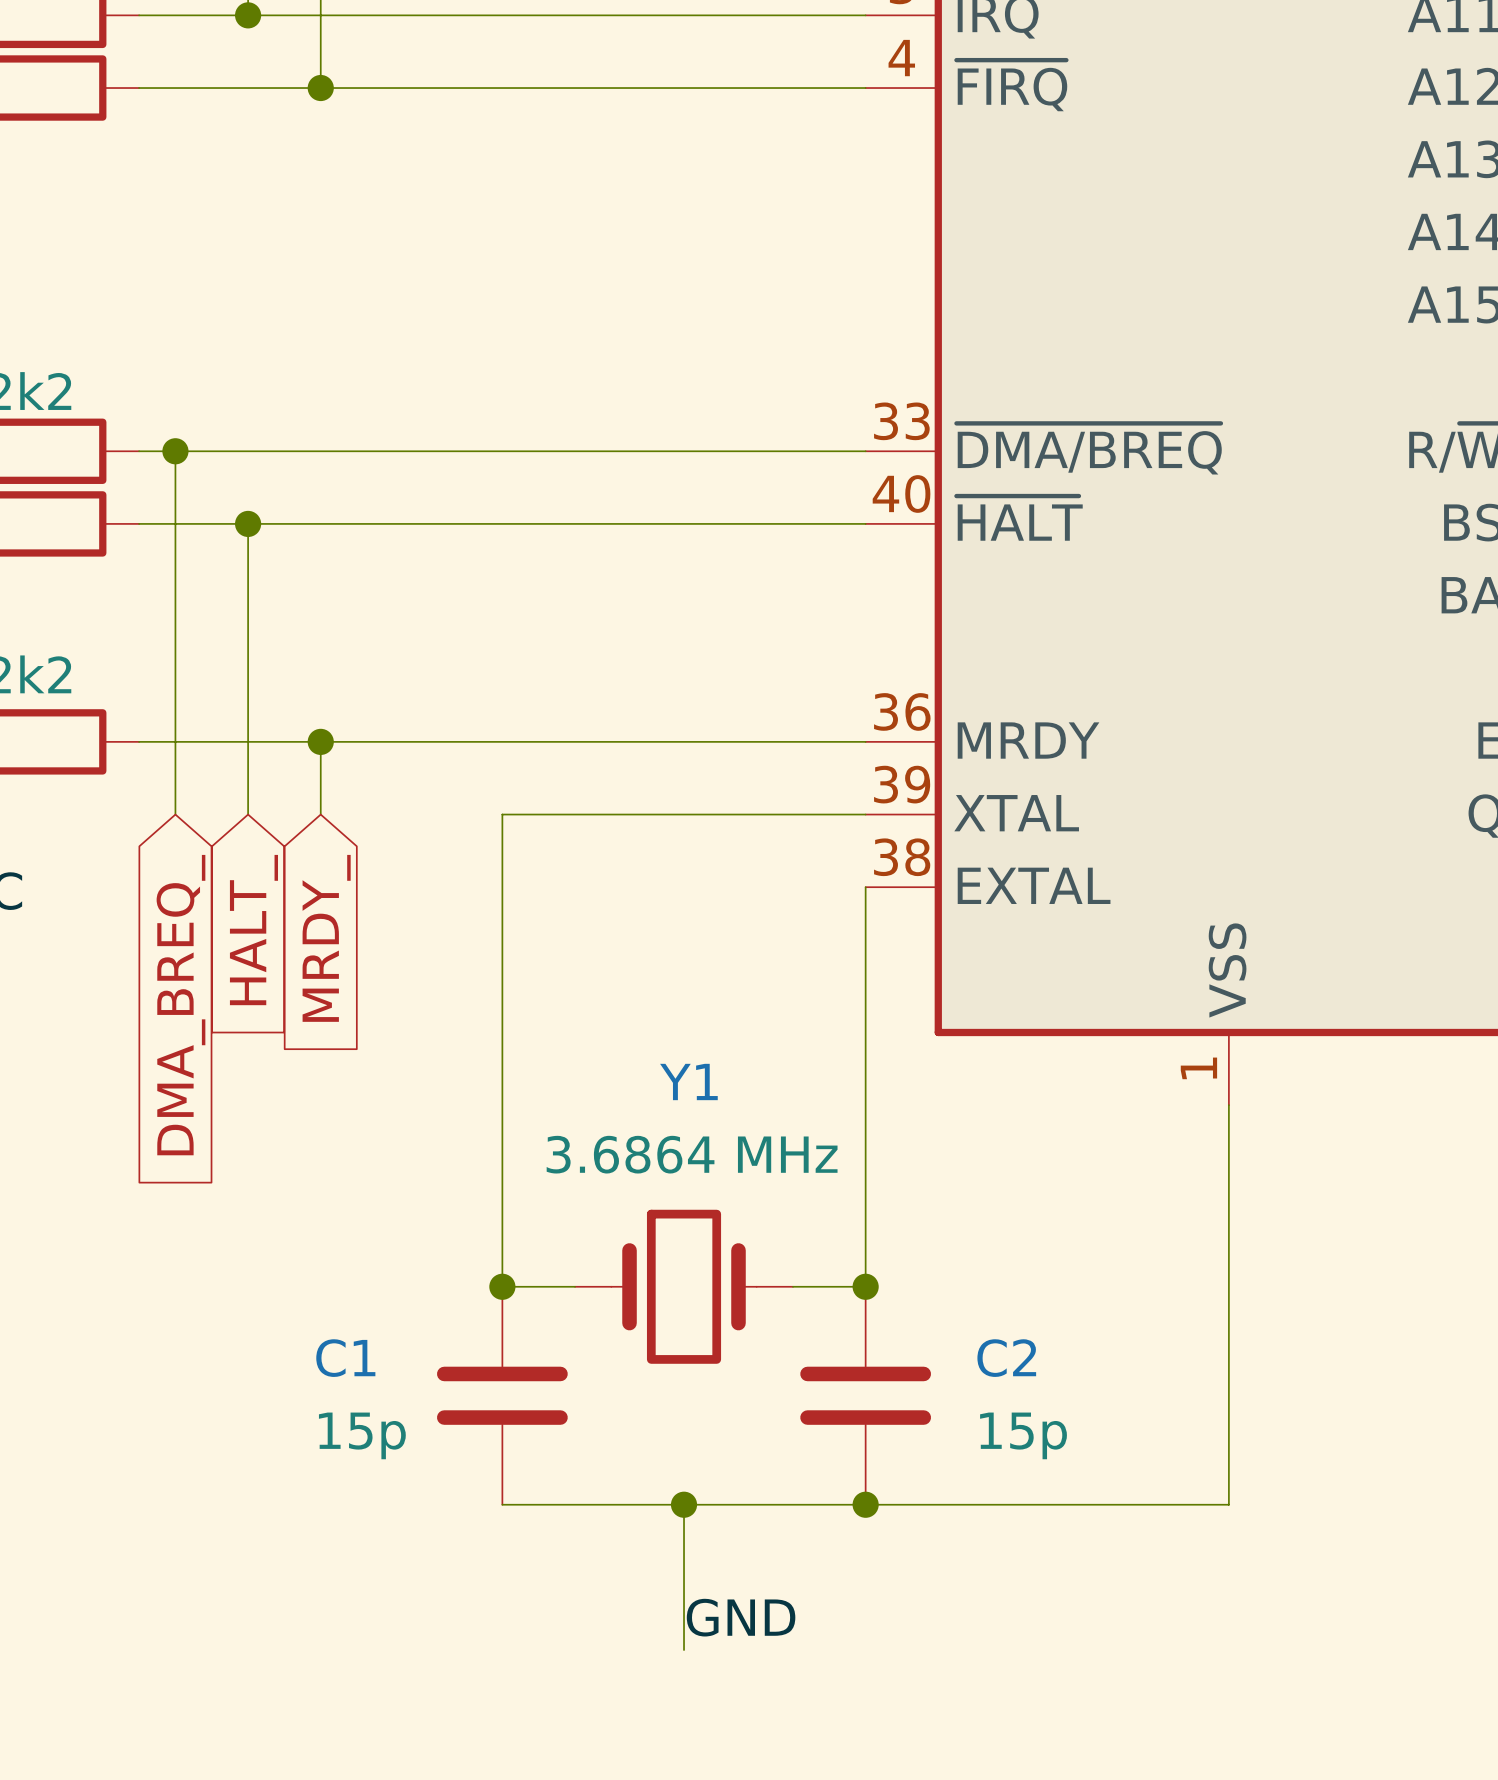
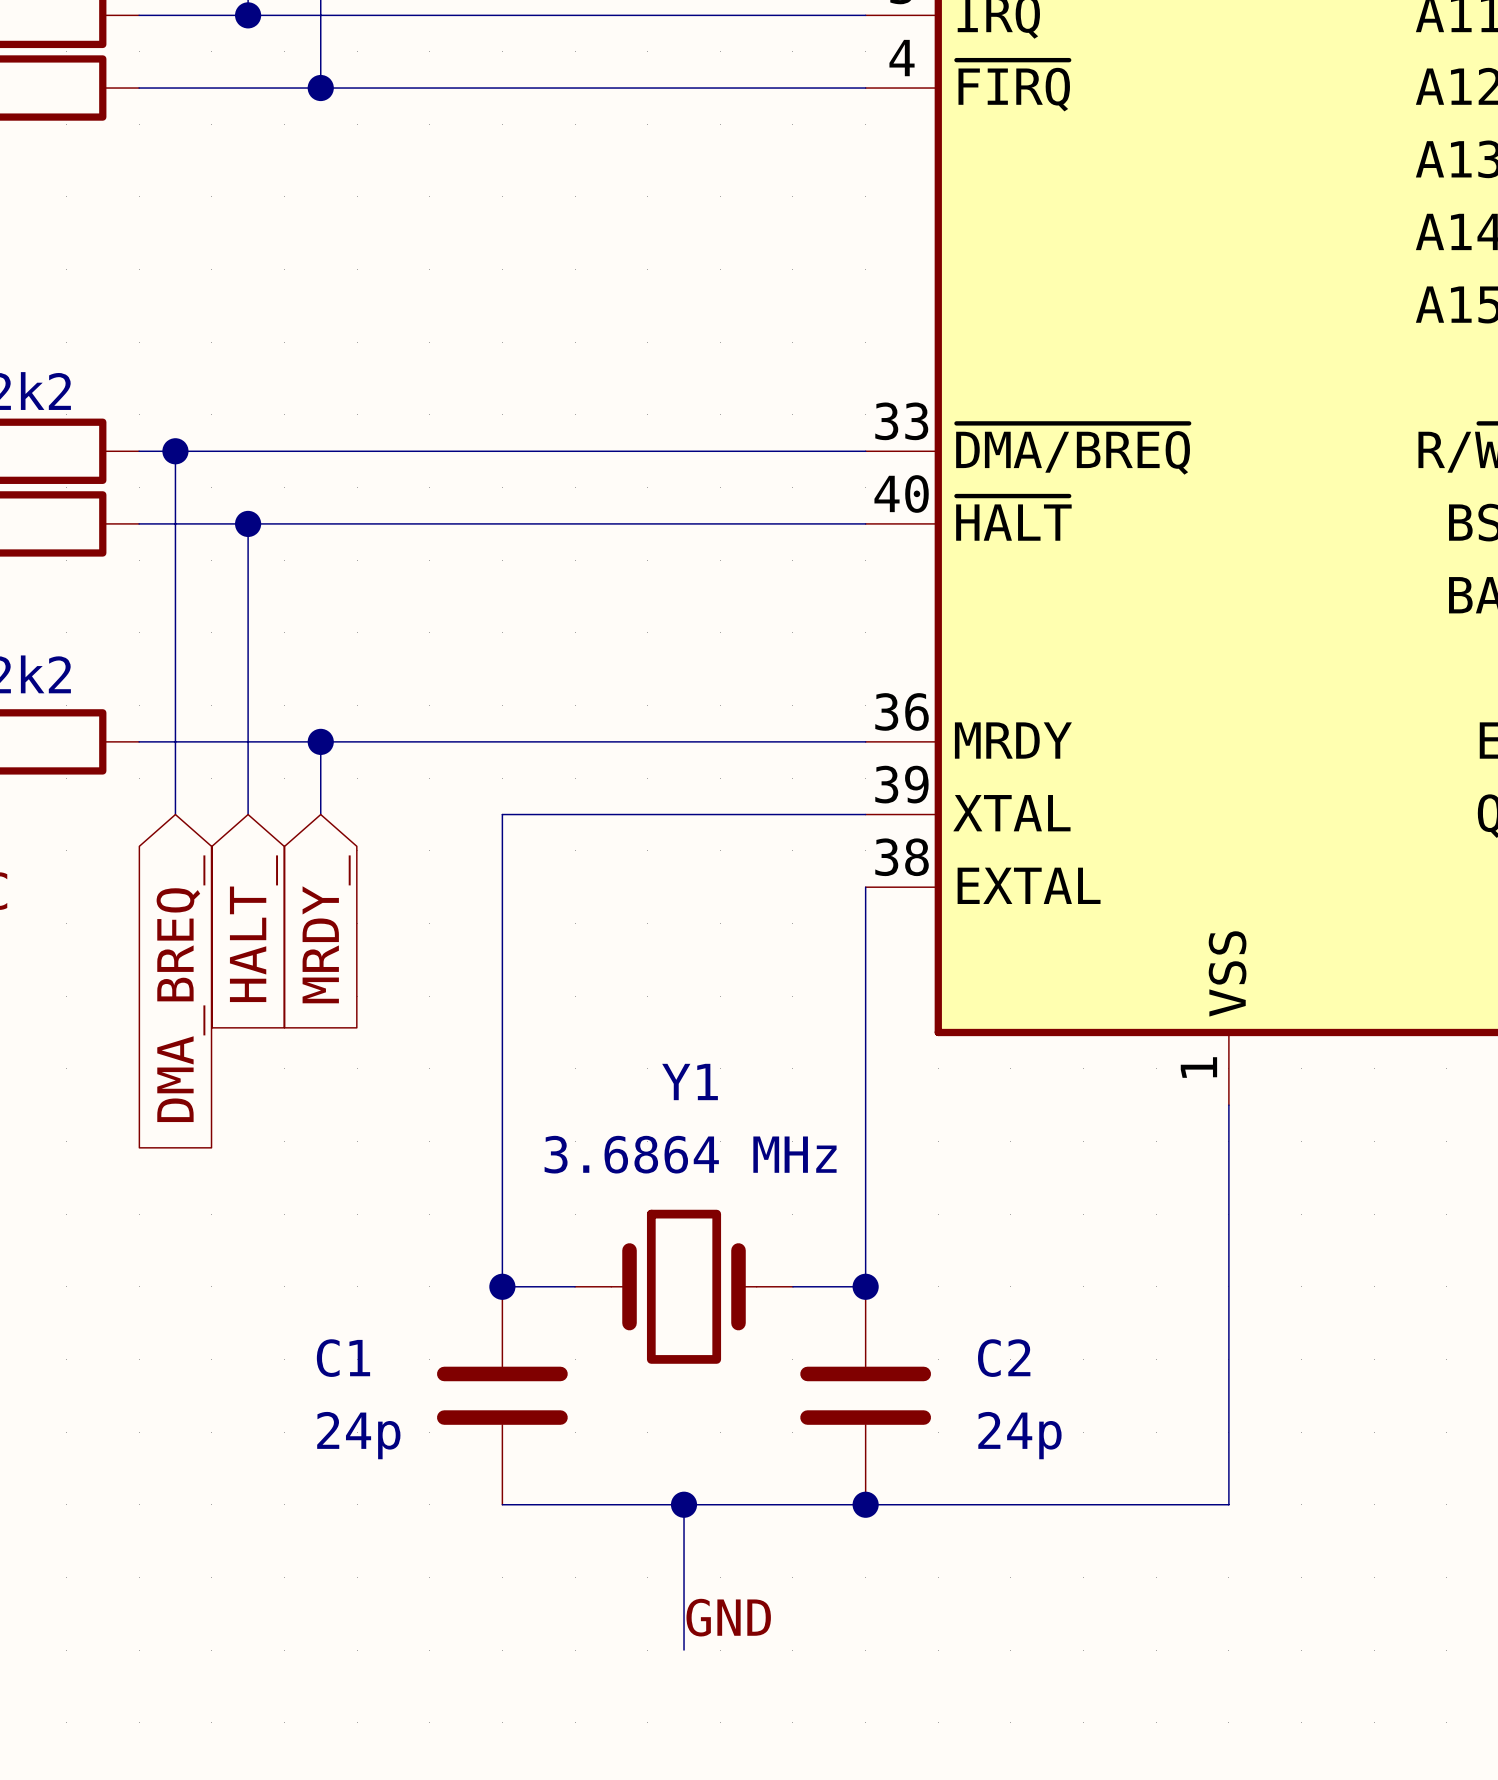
C1 value: 15p (362, 1435) -> 24p (358, 1435)
C2 value: 15p (1023, 1435) -> 24p (1019, 1435)

